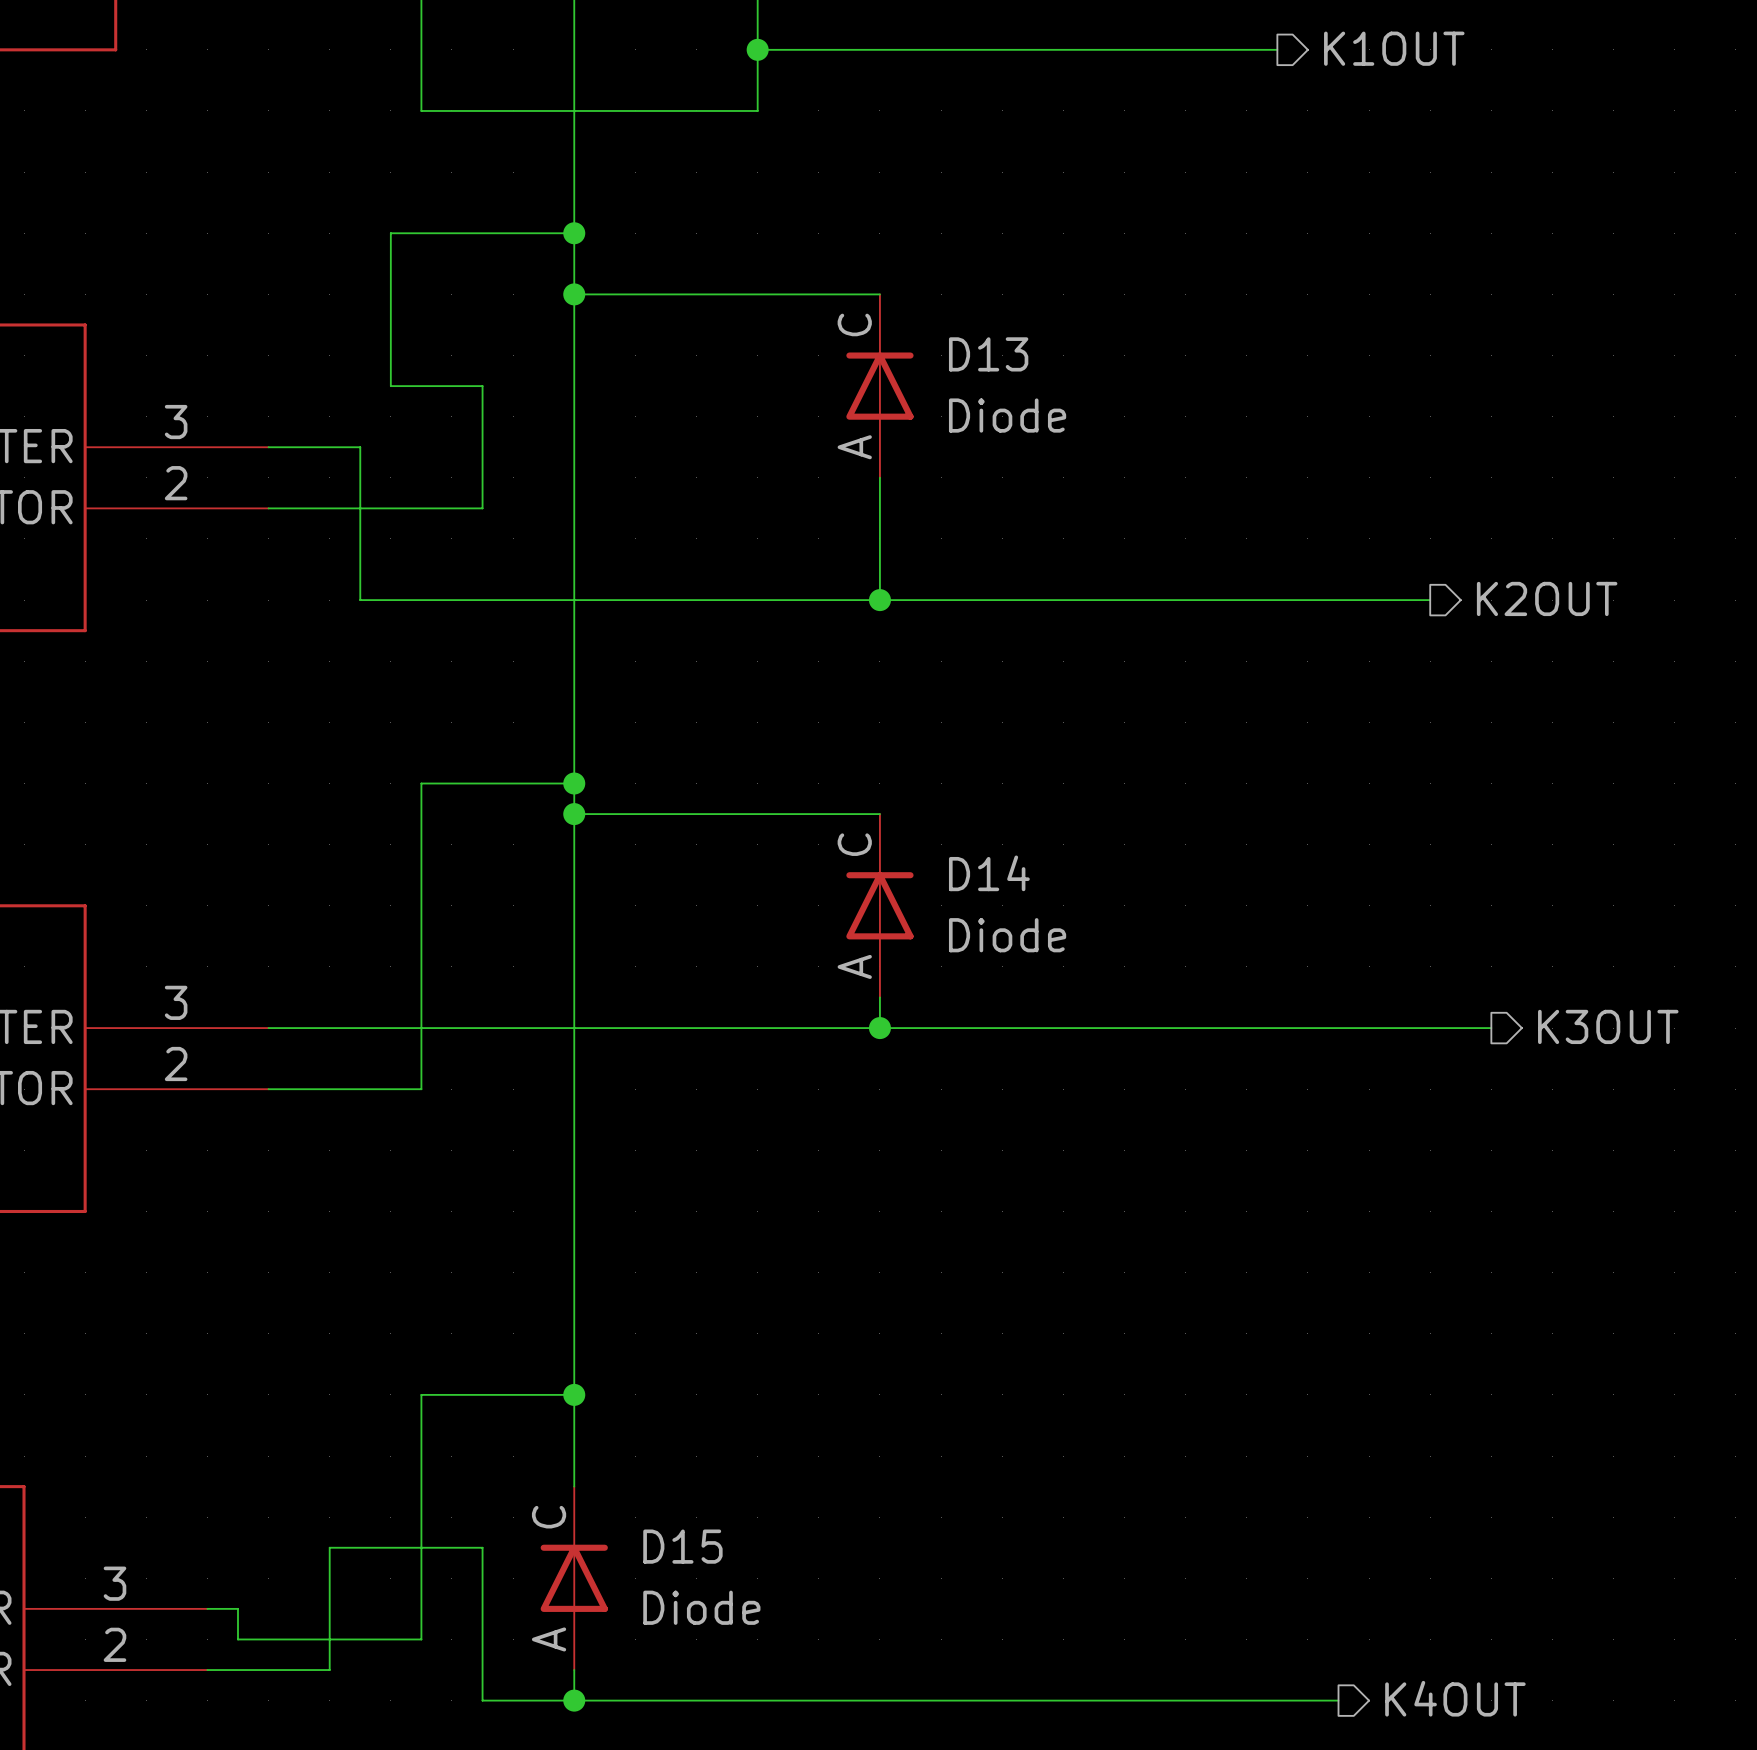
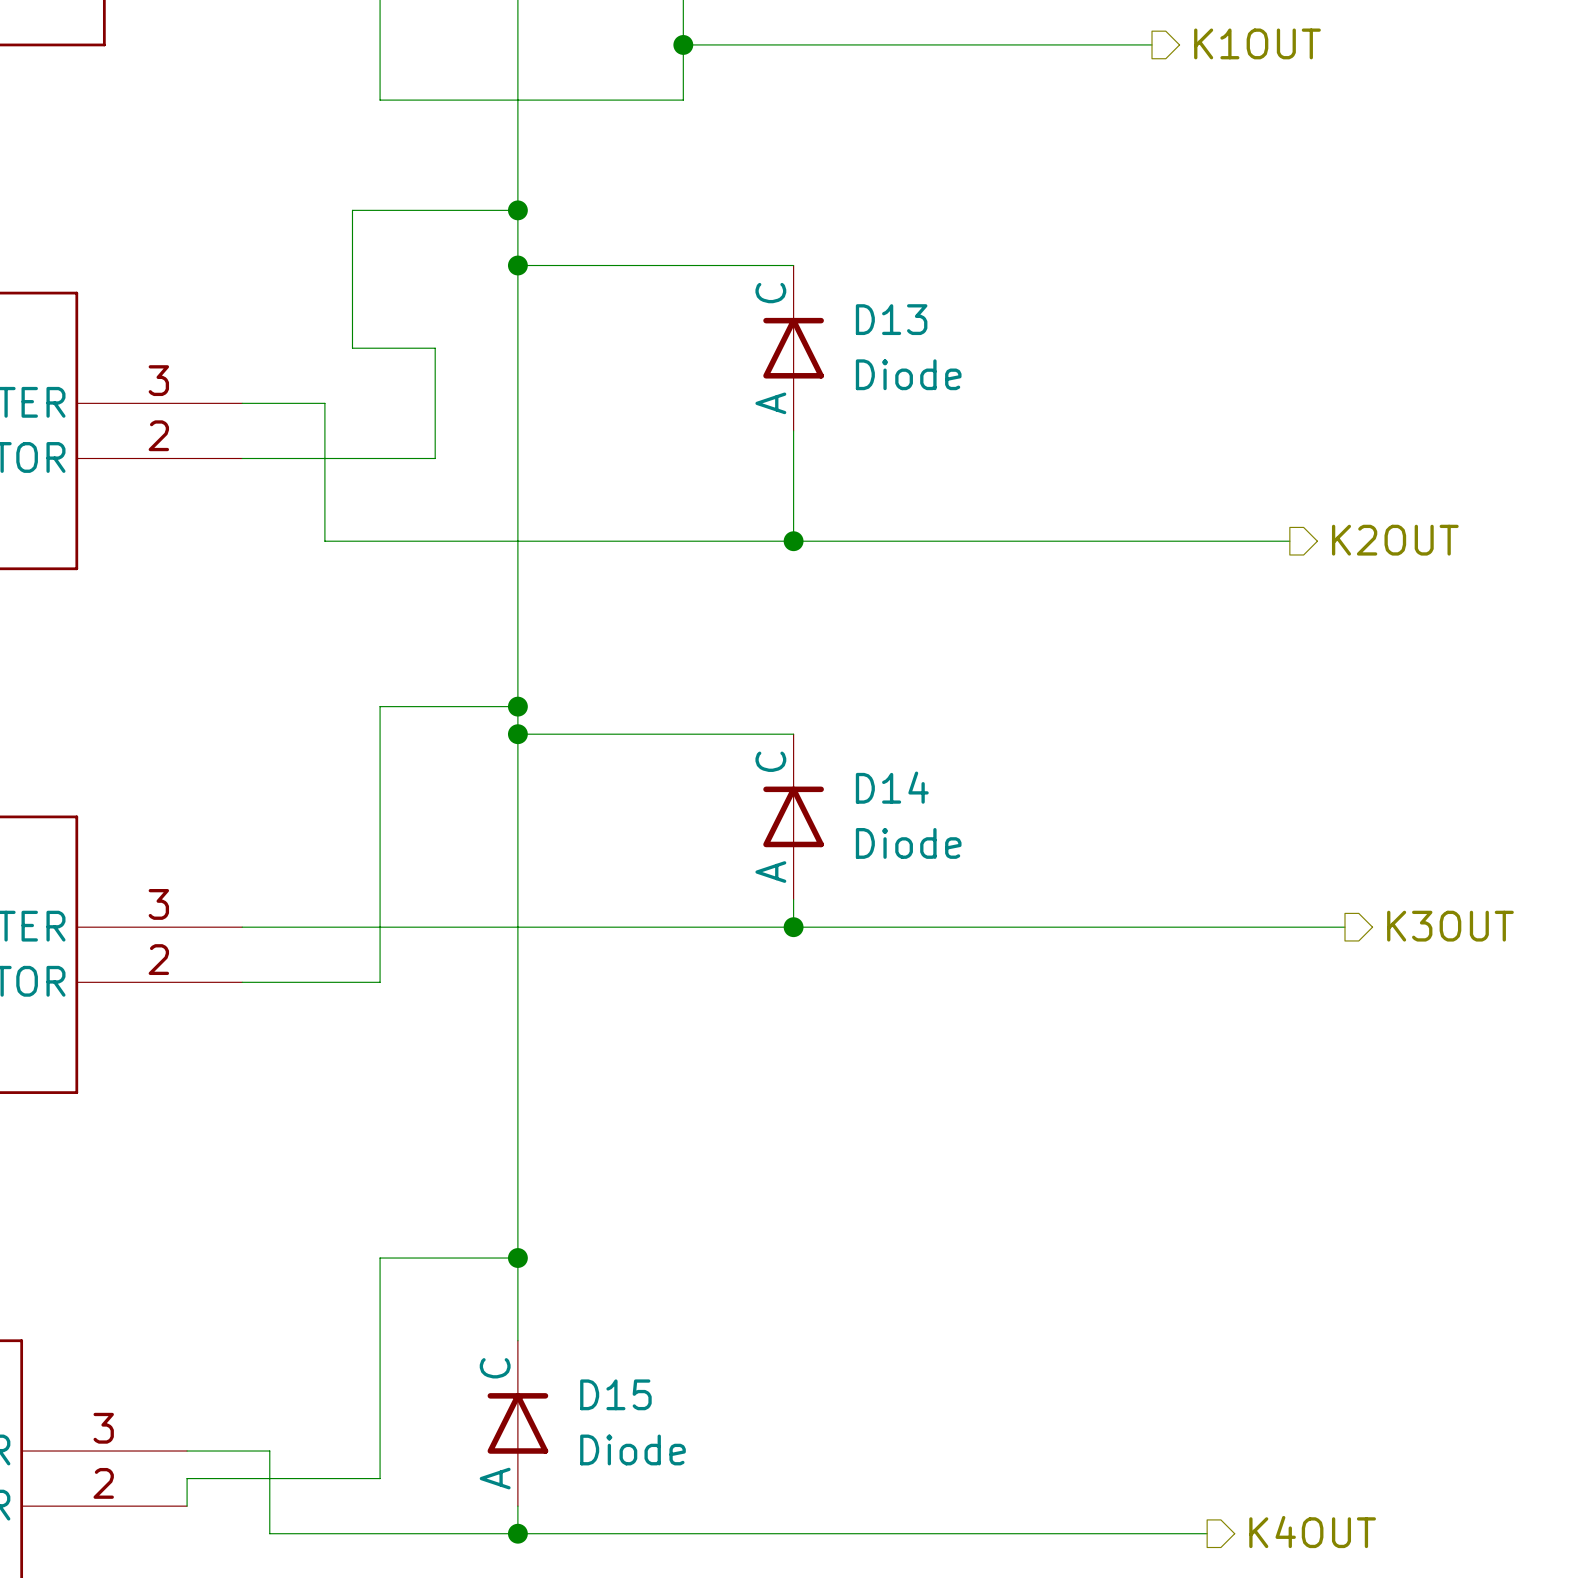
wire: (237, 1608) (237, 1639) -> (187, 1506) (187, 1478) (214, 1478)
wire: (207, 1670) (329, 1670) (329, 1547) (482, 1547) (482, 1700) -> (214, 1451) (269, 1451) (269, 1533) (435, 1533)

